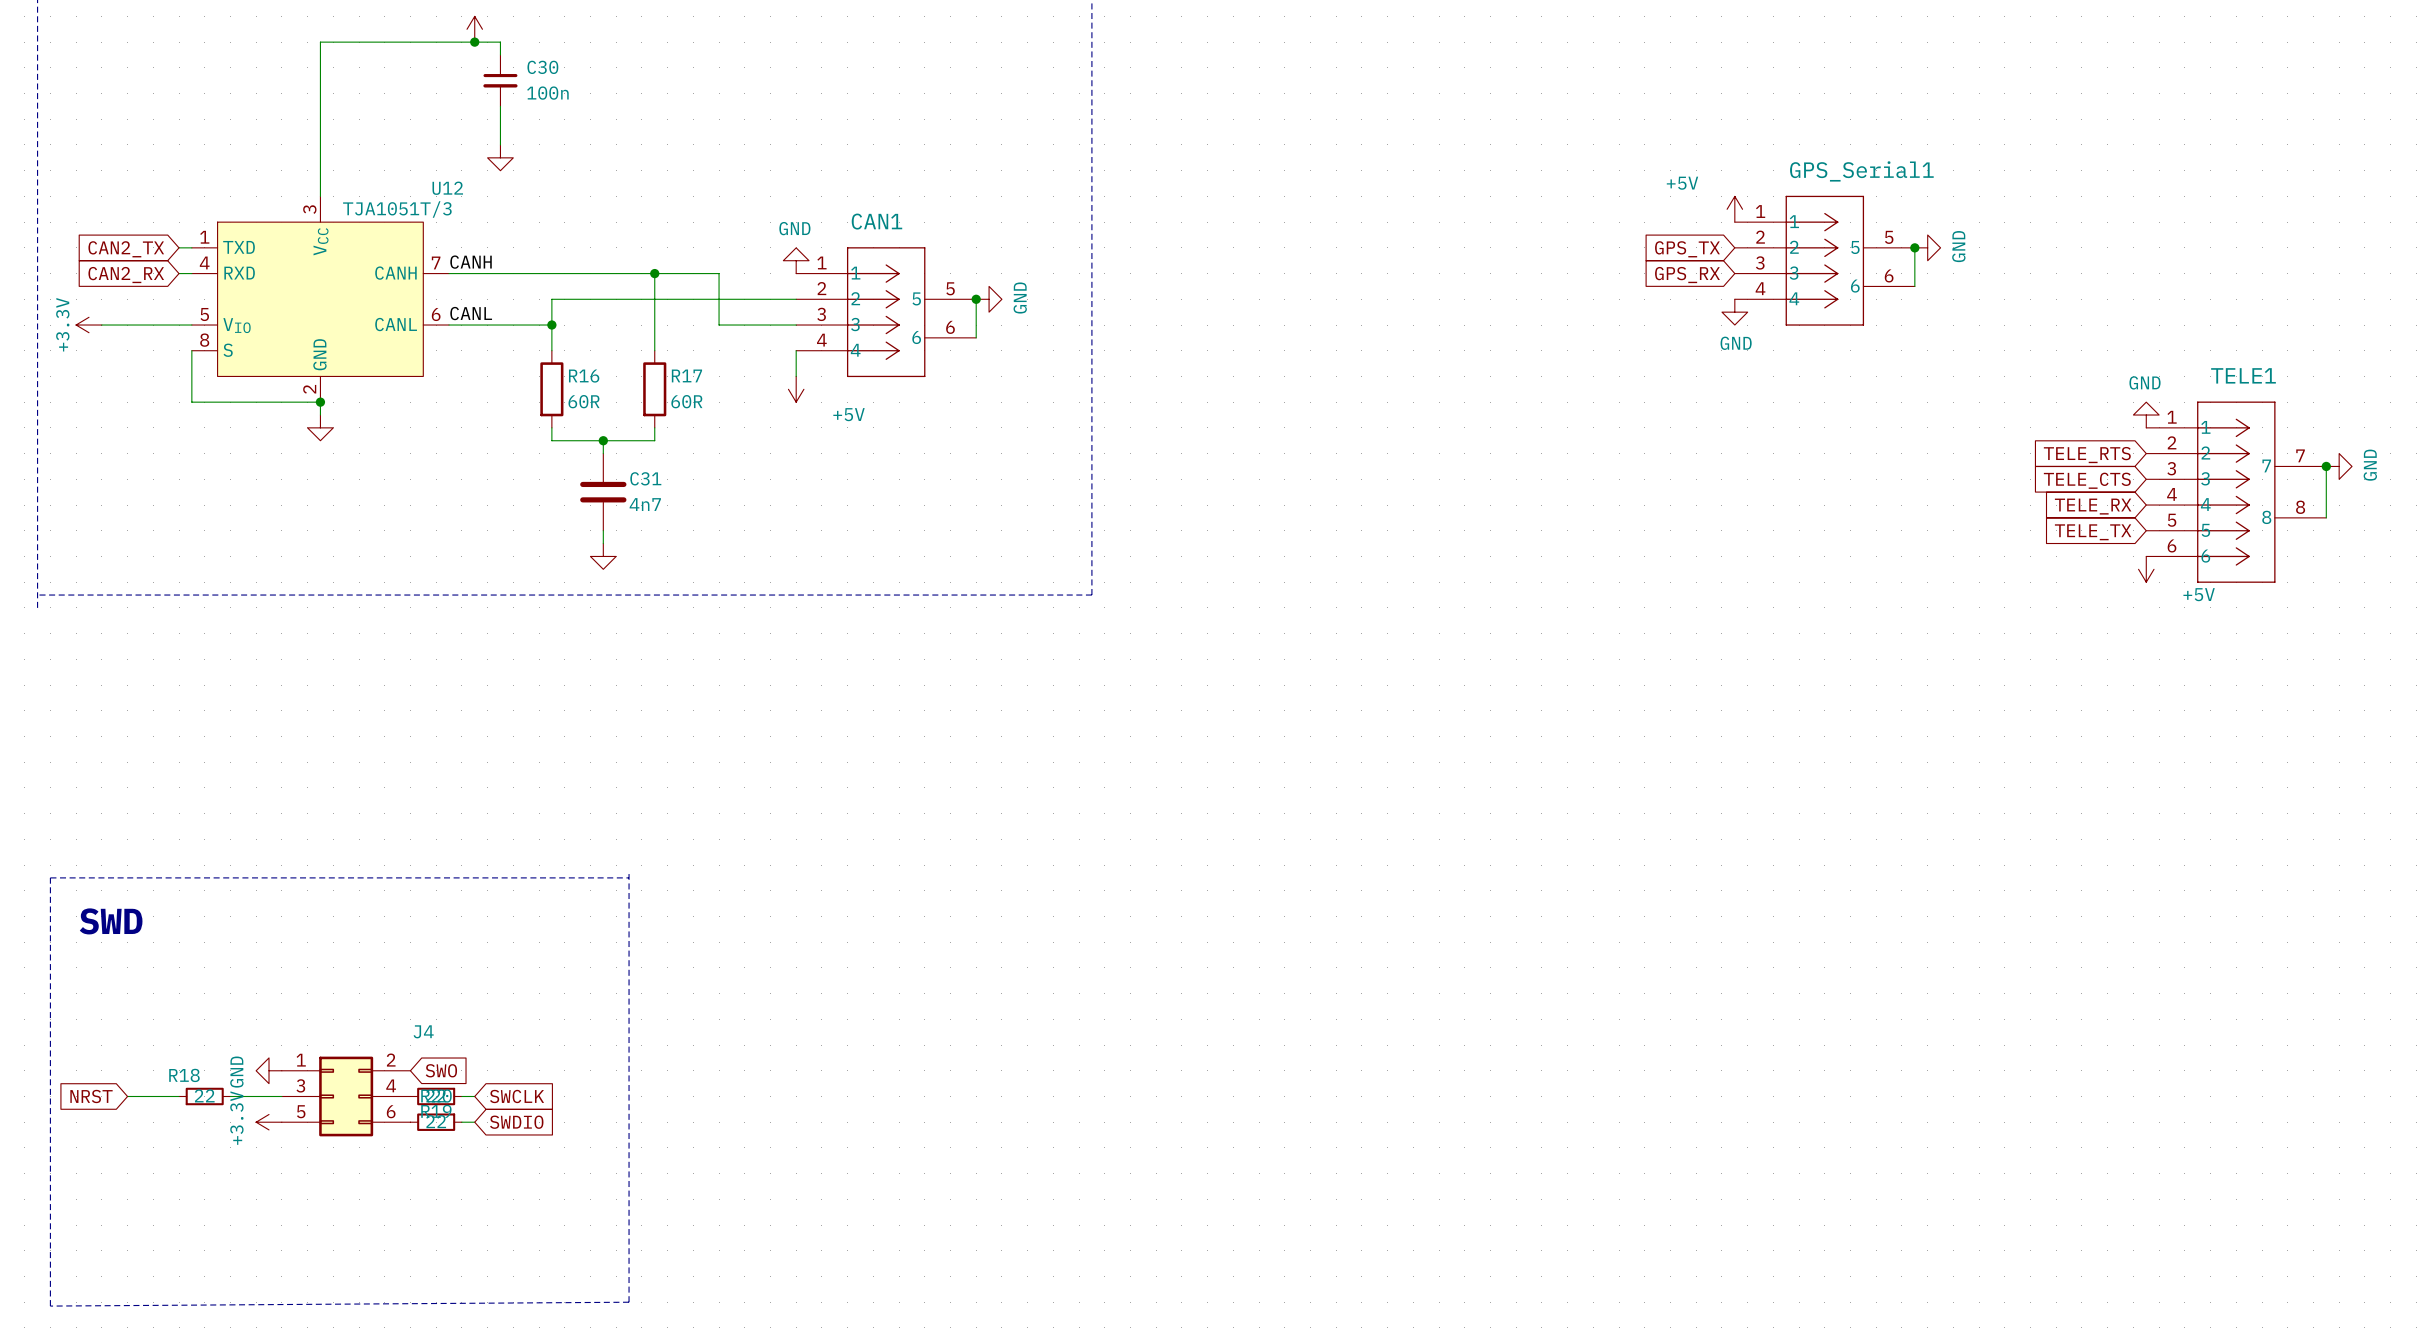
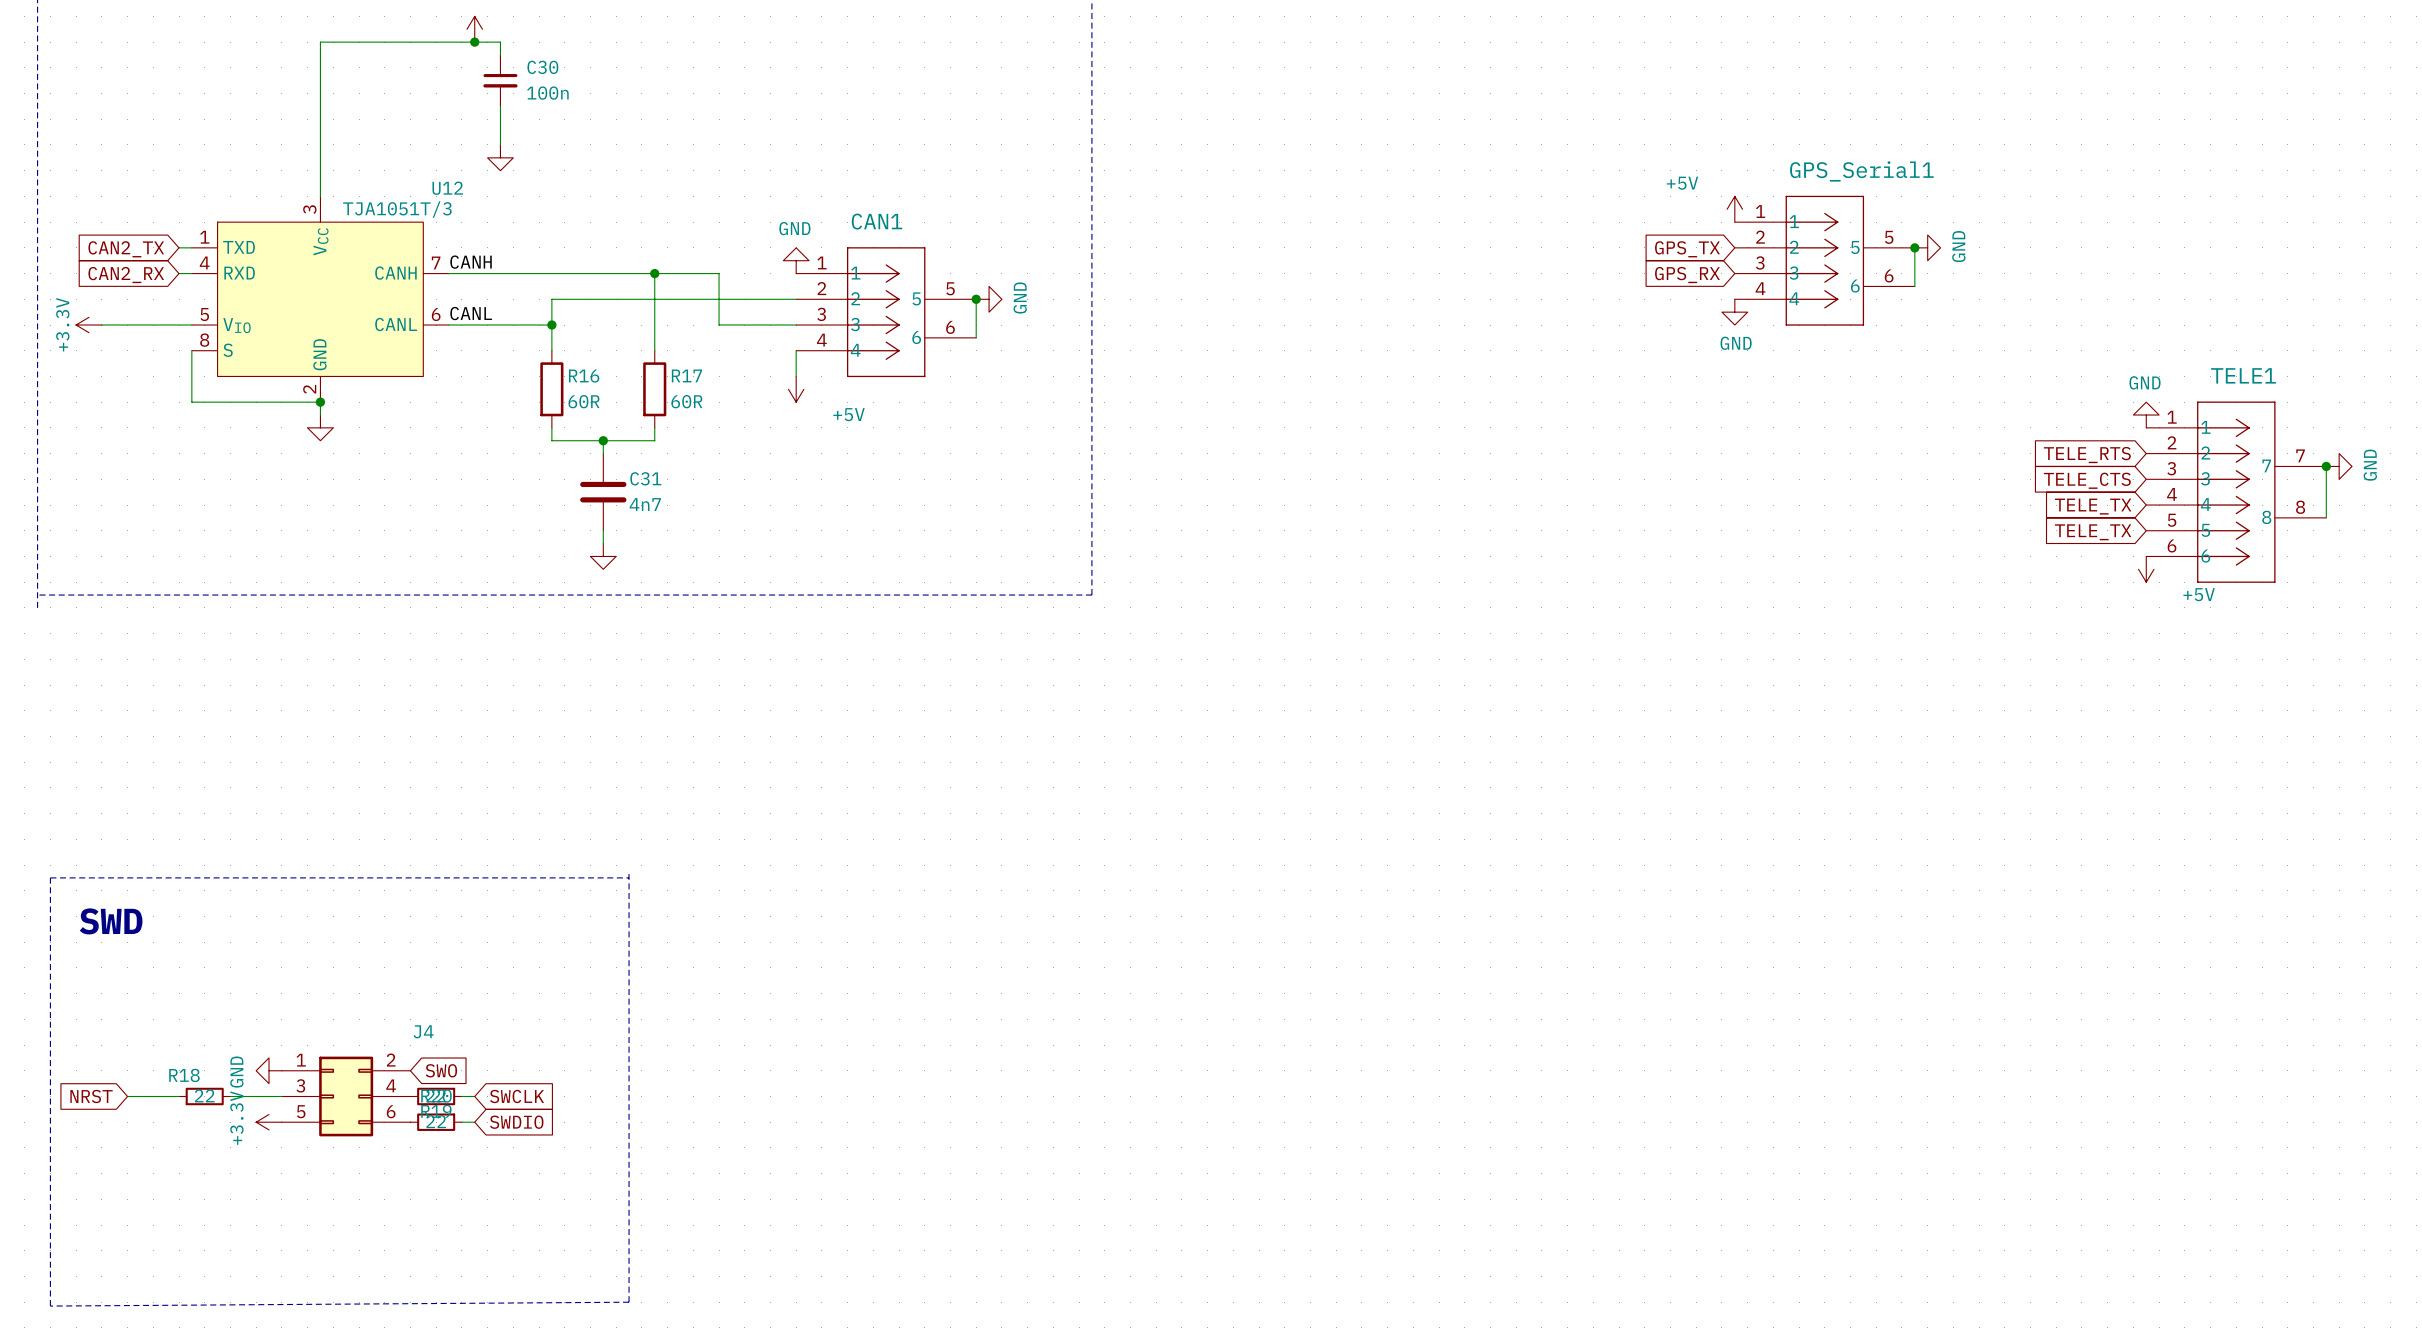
global label: TELE_RX (2093, 506) -> TELE_TX (2093, 506)

